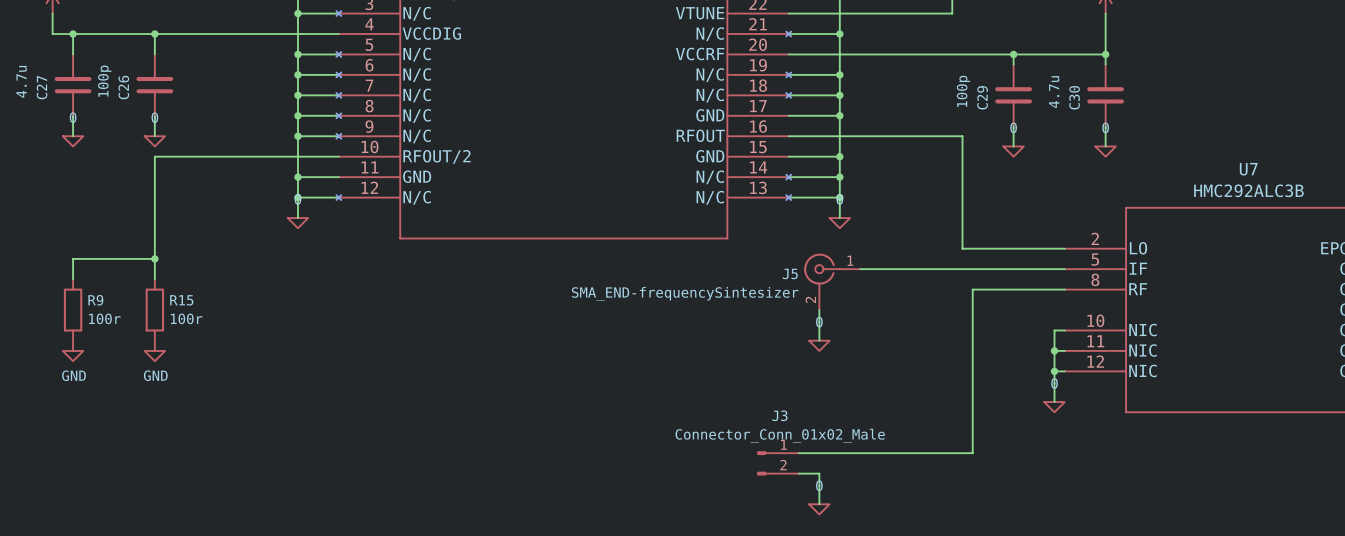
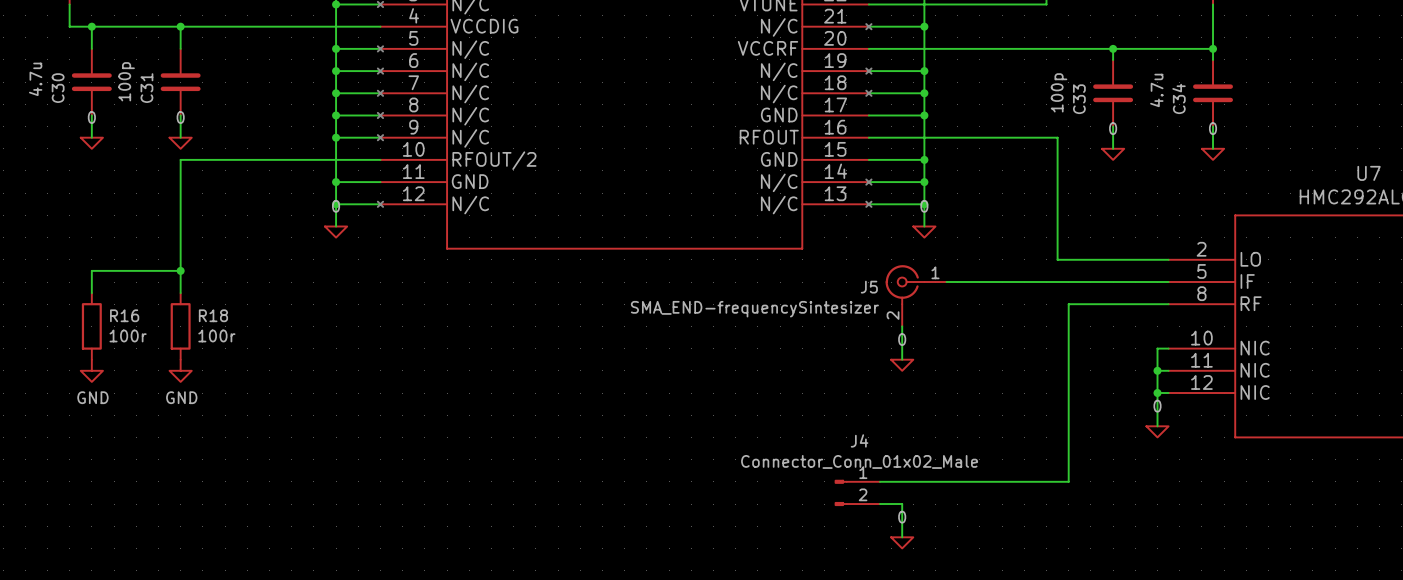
C27 name: C27 (42, 87) -> C30 (58, 88)
C26 name: C26 (123, 87) -> C31 (146, 88)
C29 name: C29 (982, 97) -> C33 (1079, 99)
C30 name: C30 (1074, 97) -> C34 (1179, 98)
R9 name: R9 (95, 300) -> R16 (124, 315)
R15 name: R15 (181, 300) -> R18 (213, 315)
J3 name: J3 (779, 415) -> J4 (859, 440)

